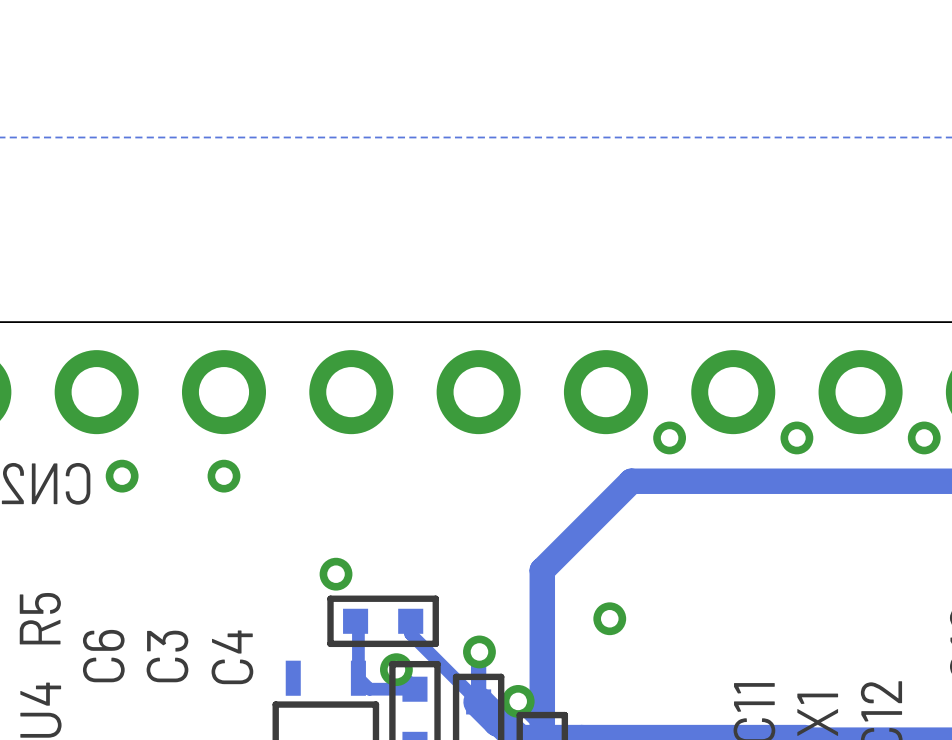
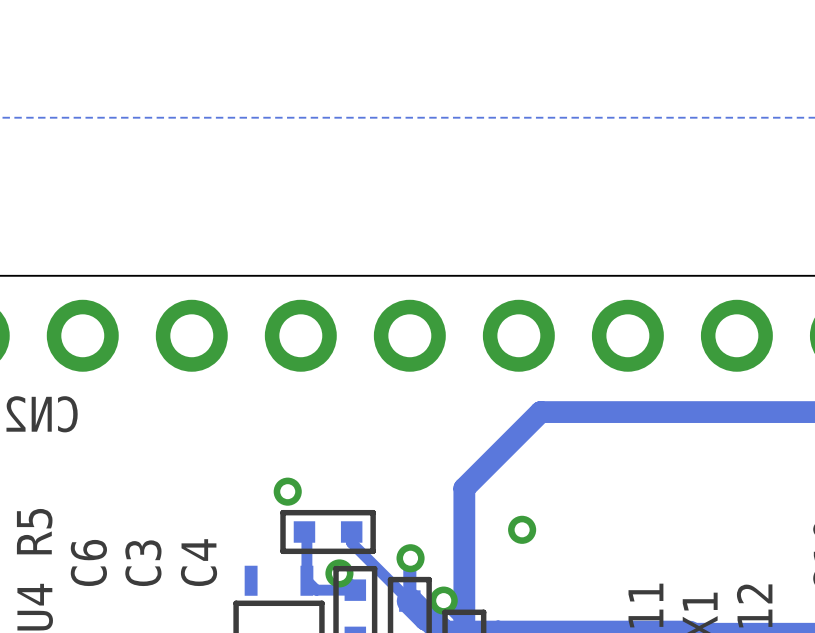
via: (669, 437) -> none
via: (796, 437) -> none
via: (924, 437) -> none
via: (122, 476) -> none
via: (223, 476) -> none

